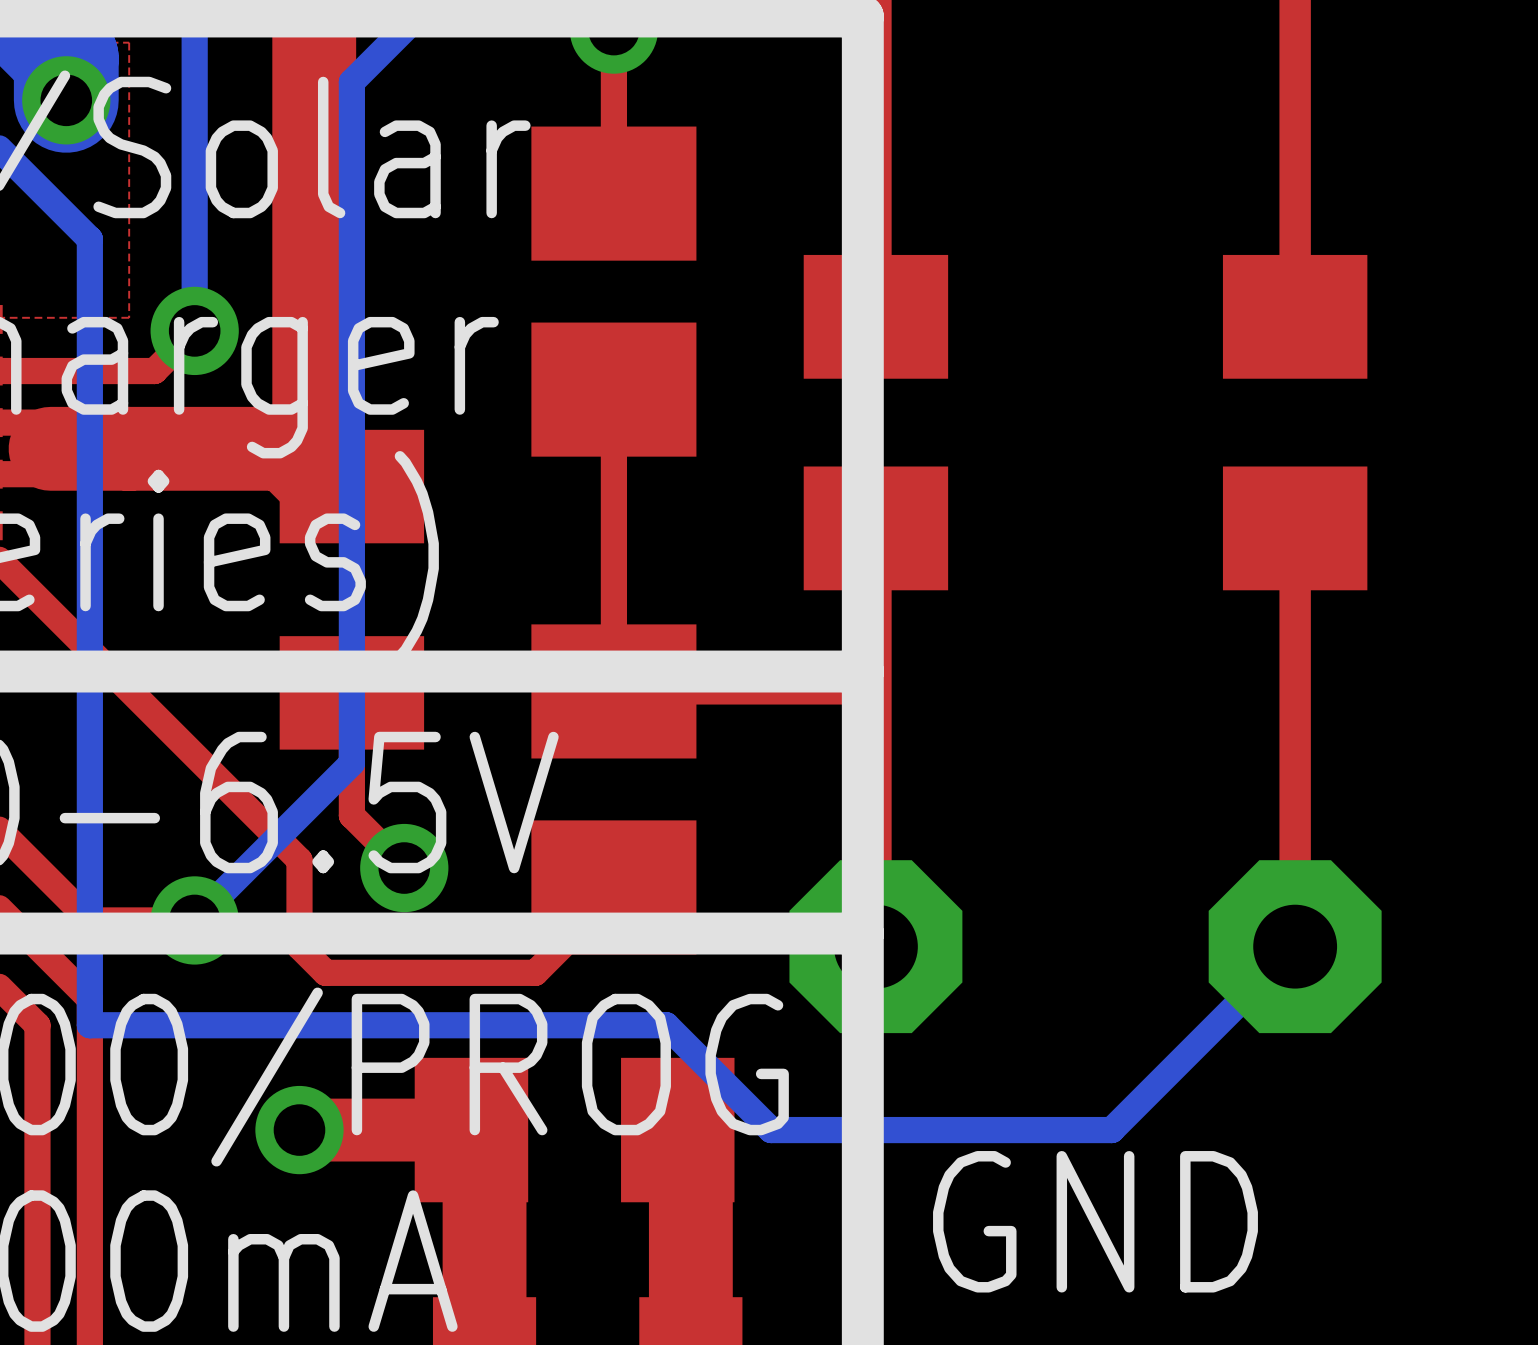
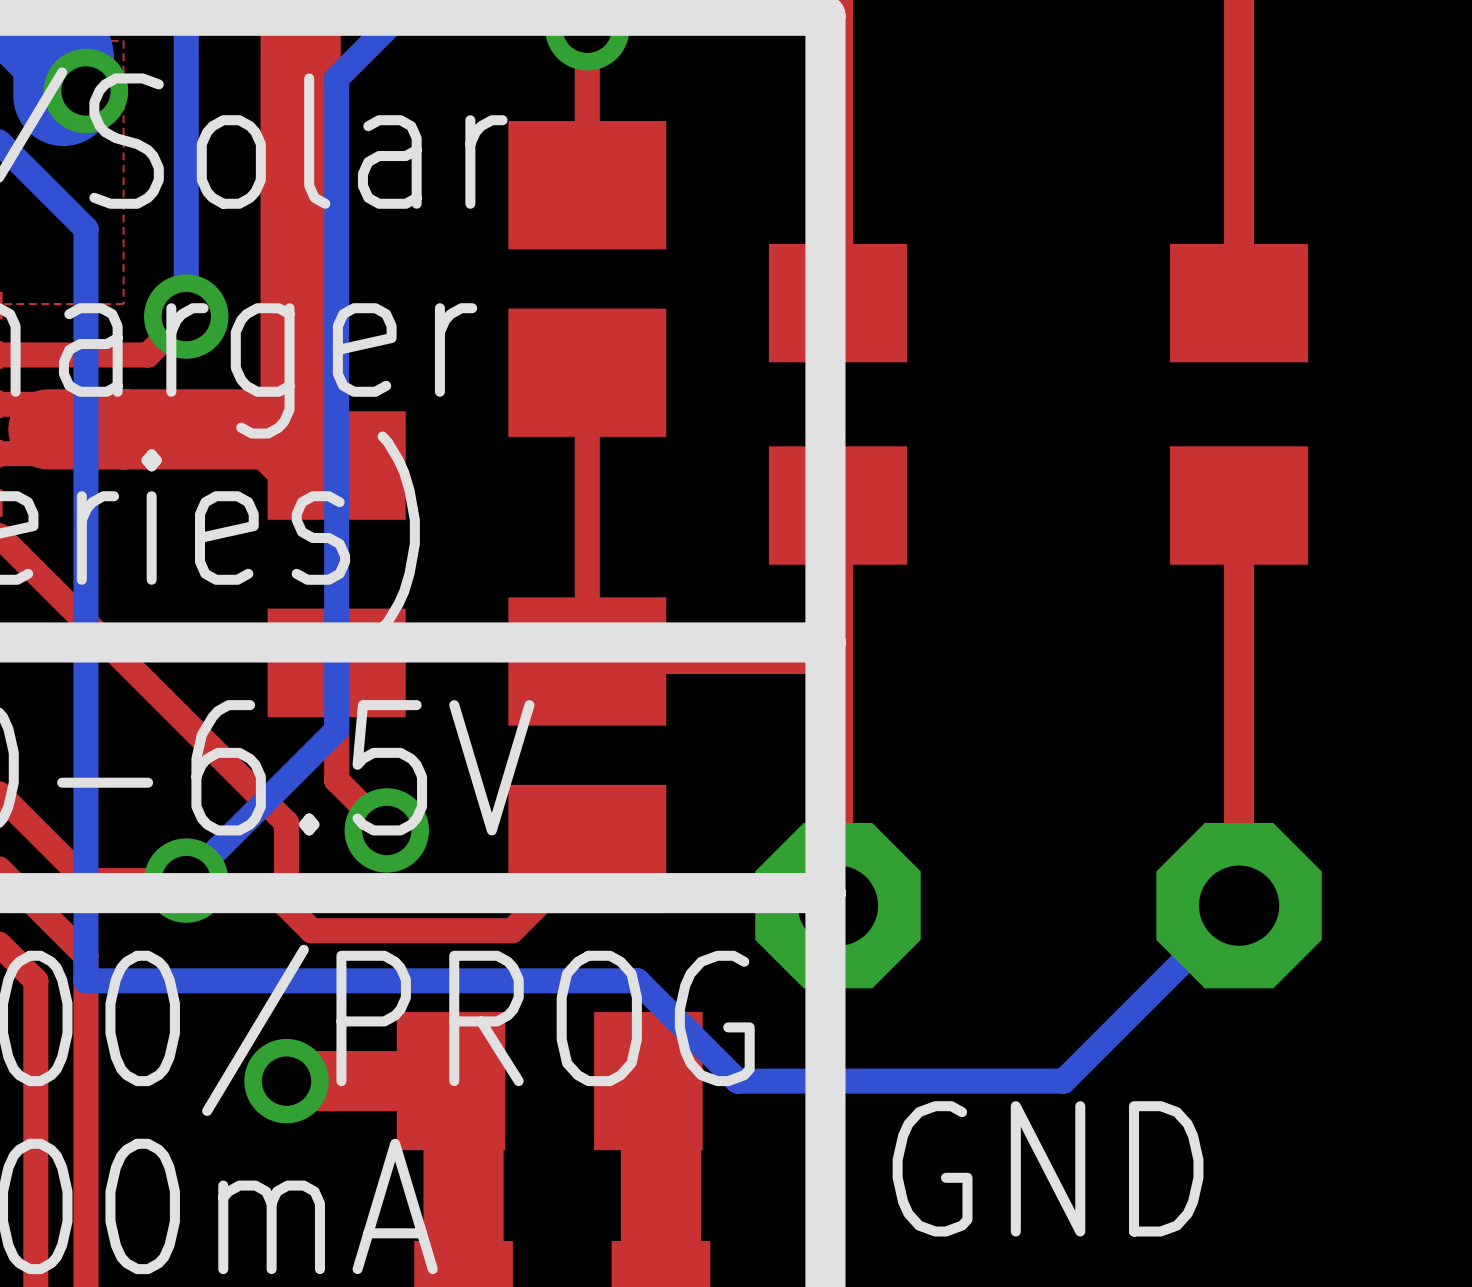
via position: (66, 100) -> (85, 90)

